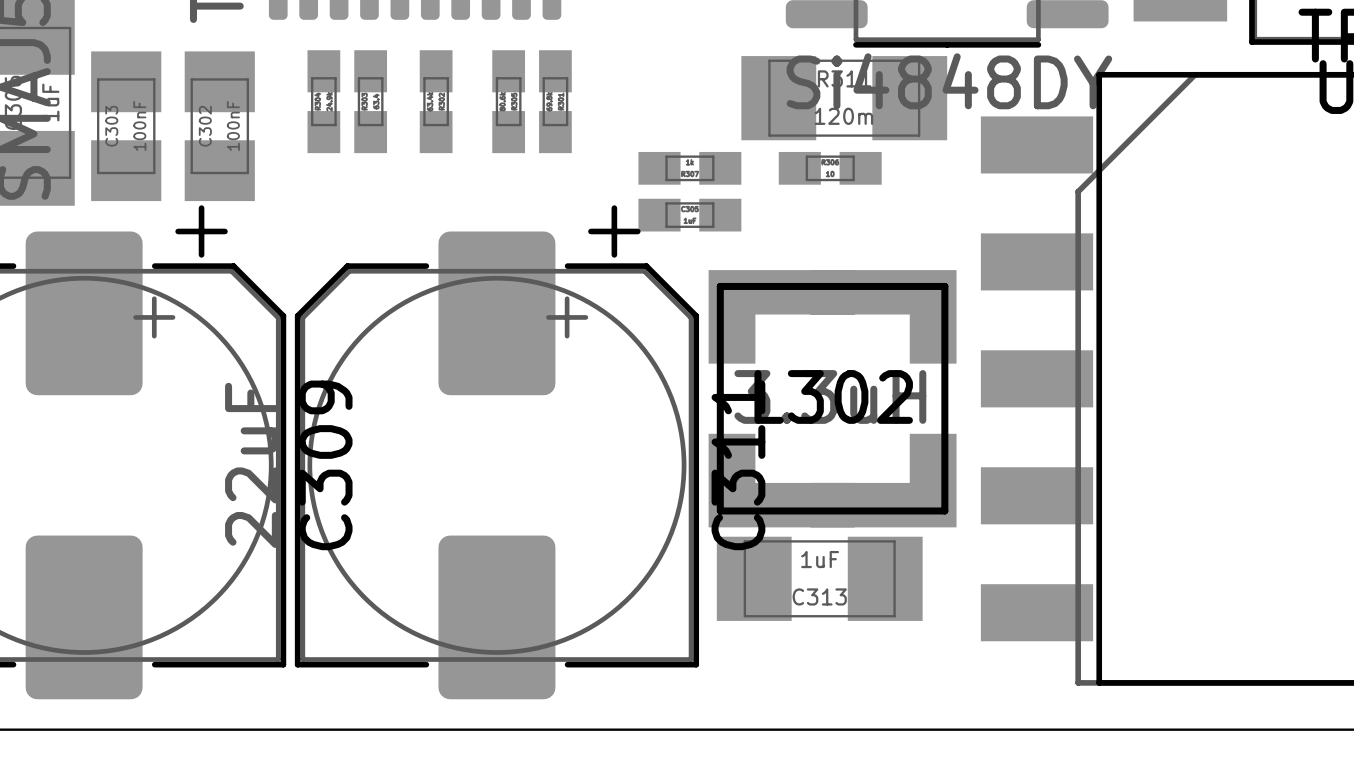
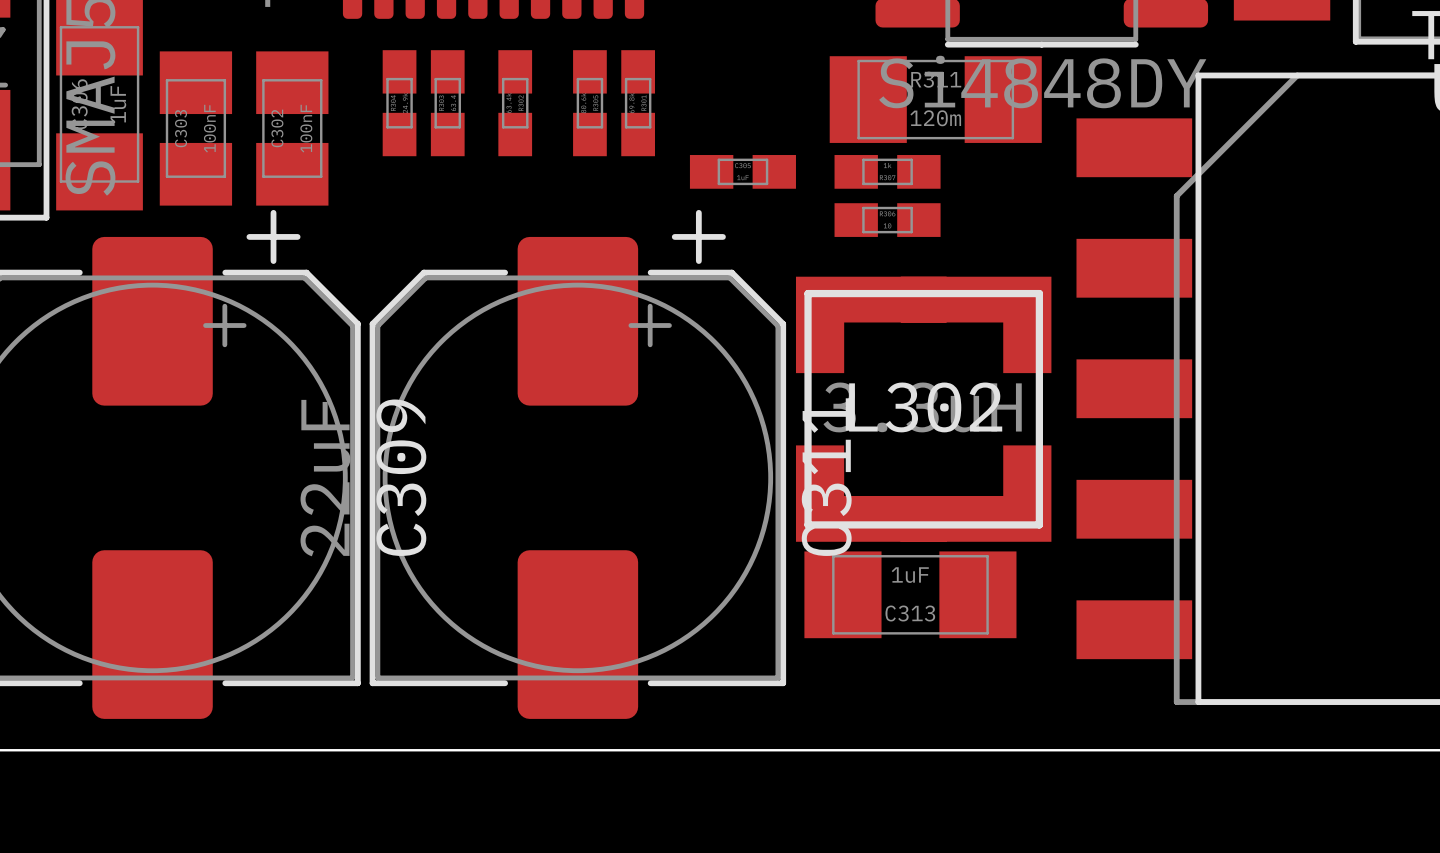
part position: (689, 168) -> (887, 171)
part position: (830, 168) -> (887, 220)
part position: (689, 215) -> (742, 171)

